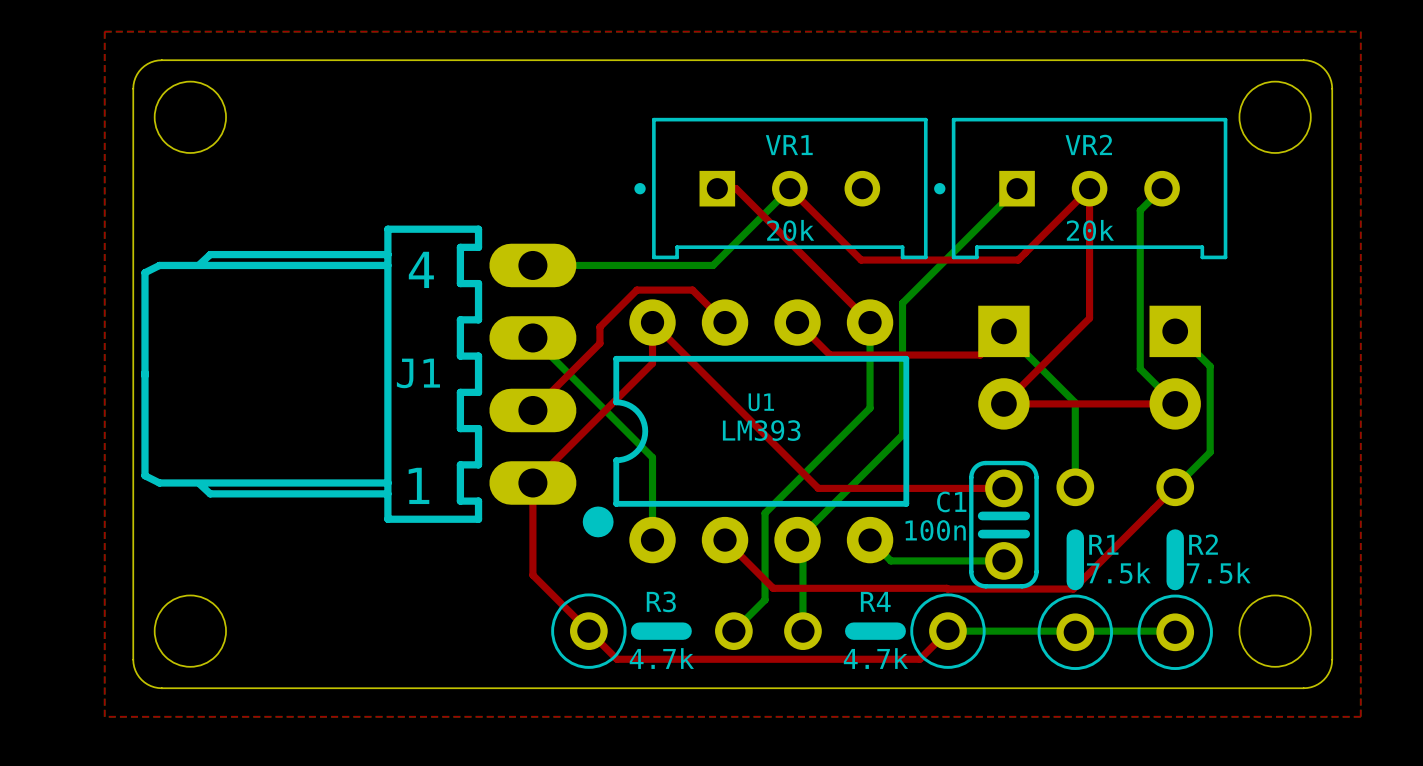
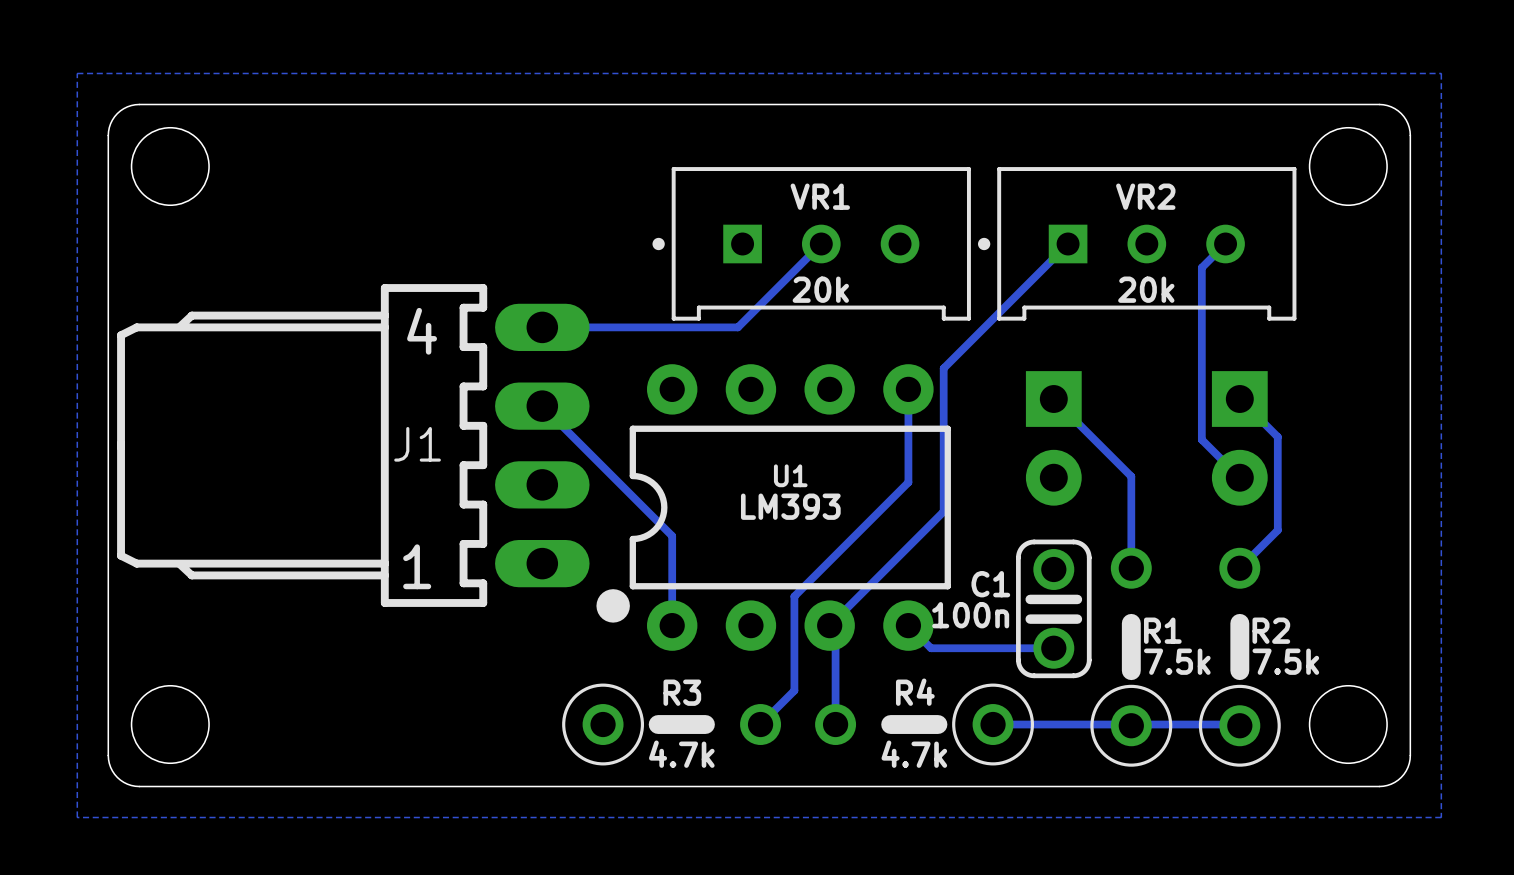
top zone outline: (104, 31) (104, 716) (1360, 716) (1360, 31) (104, 31) -> none
top track: (717, 188) (736, 188) (870, 322) -> none
top track: (789, 188) (861, 260) (1018, 260) (1089, 188) (1089, 318) (1003, 403) (1175, 403) -> none
top track: (725, 322) (692, 290) (636, 290) (599, 327) (599, 343) (532, 410) -> none
top track: (797, 322) (830, 355) (980, 355) (1003, 331) -> none
top track: (1175, 487) (1073, 589) (773, 588) (725, 540) -> none
top track: (1003, 488) (818, 488) (652, 322) (652, 363) (532, 482) (532, 575) (616, 659) (919, 659) (947, 631) -> none

